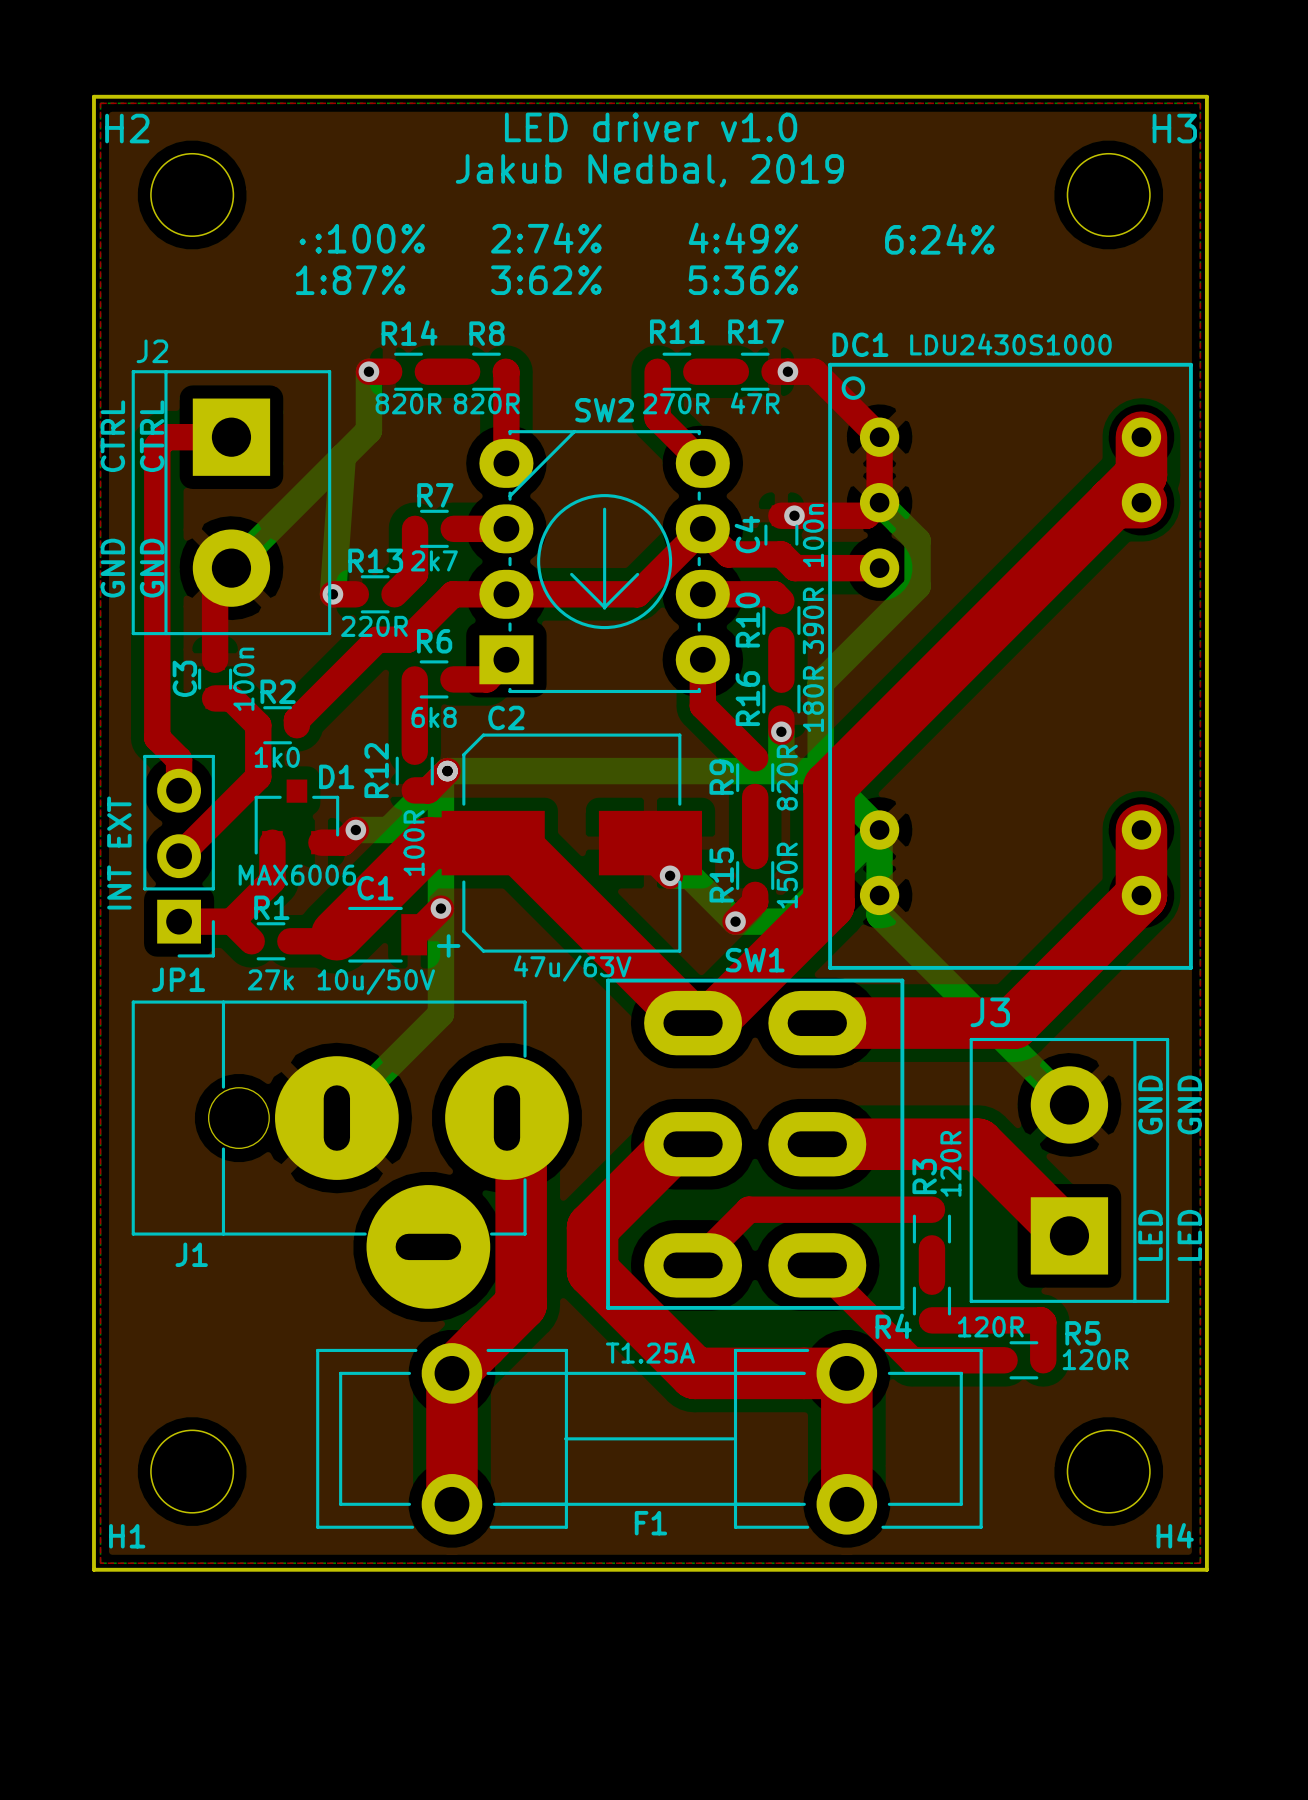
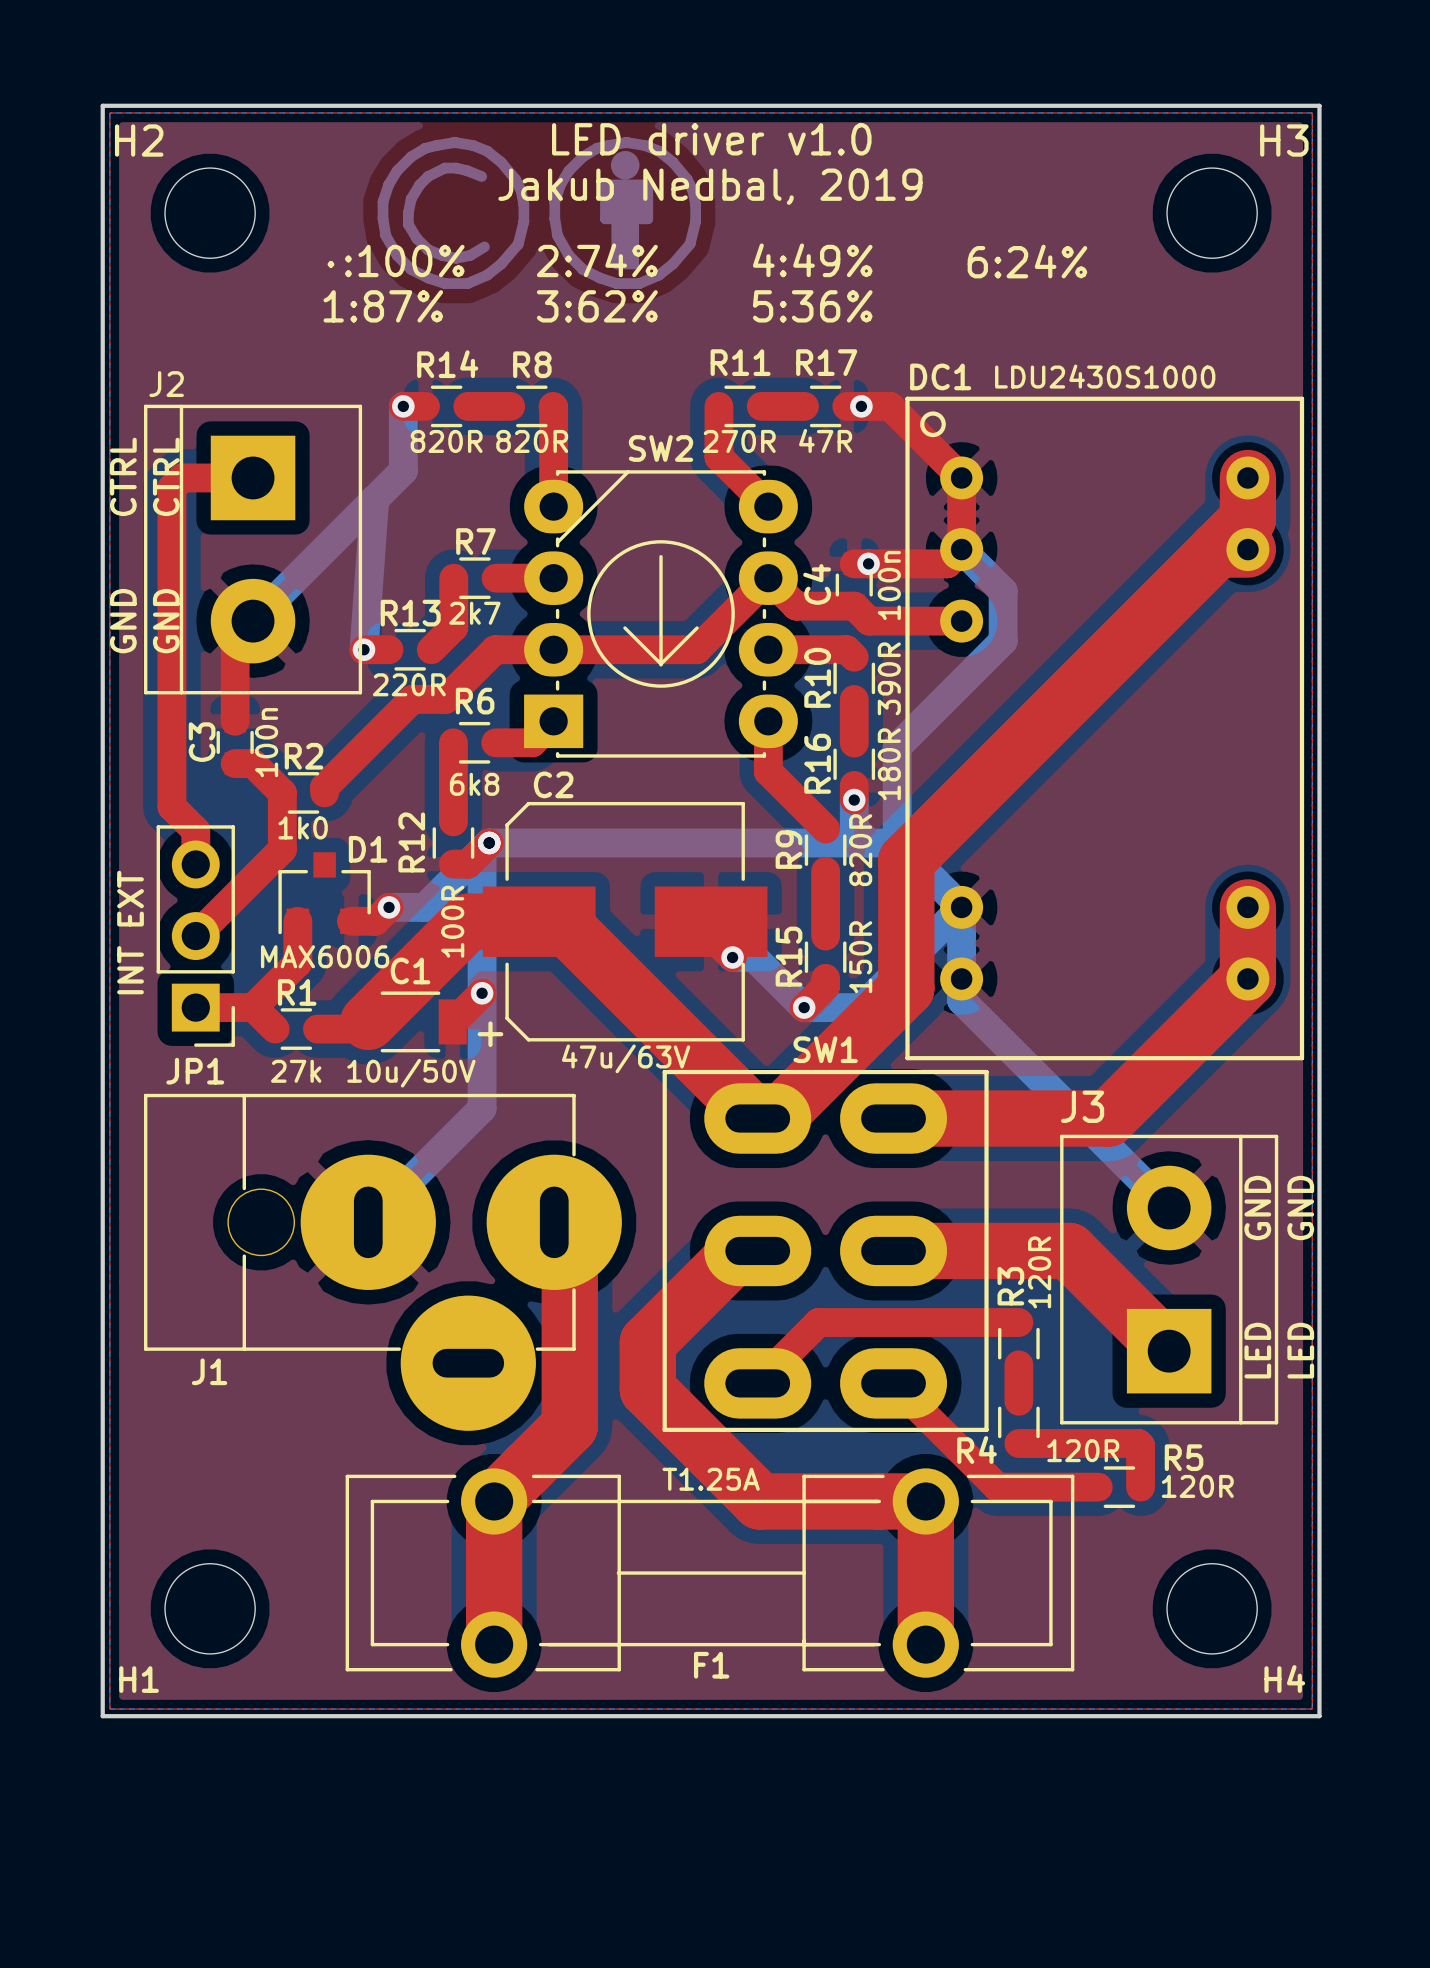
drawing: none -> [377, 137, 702, 289]

